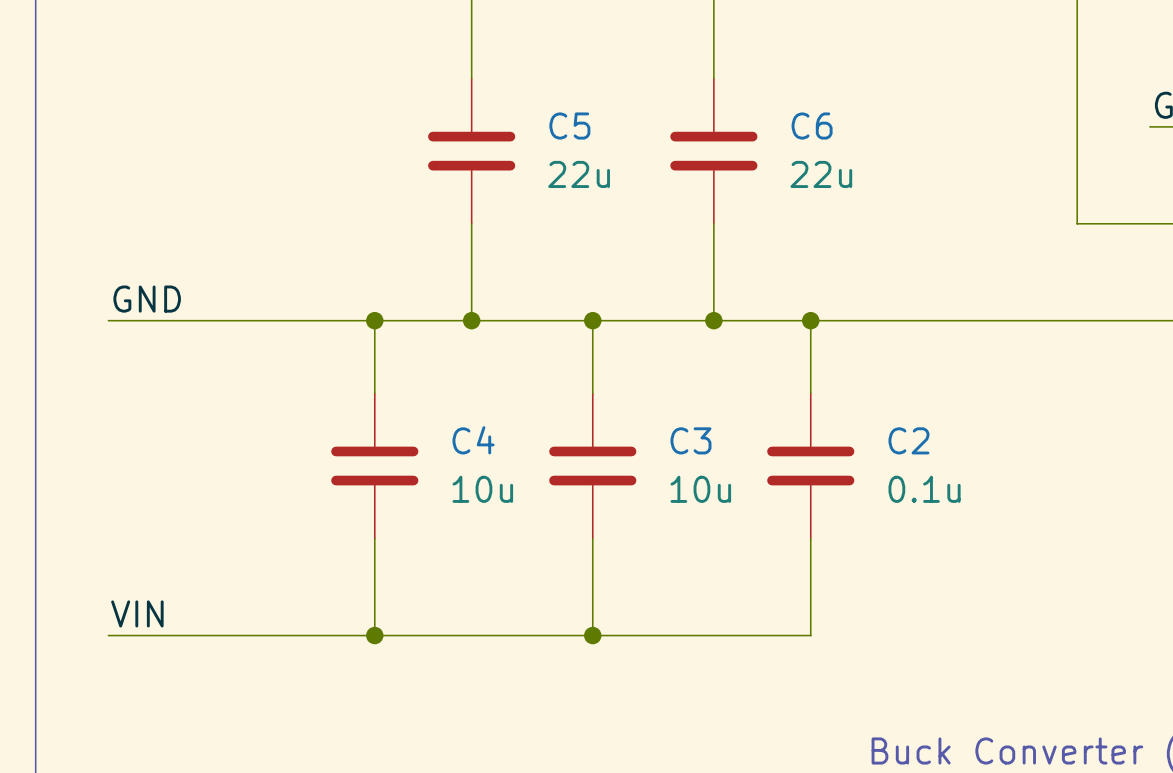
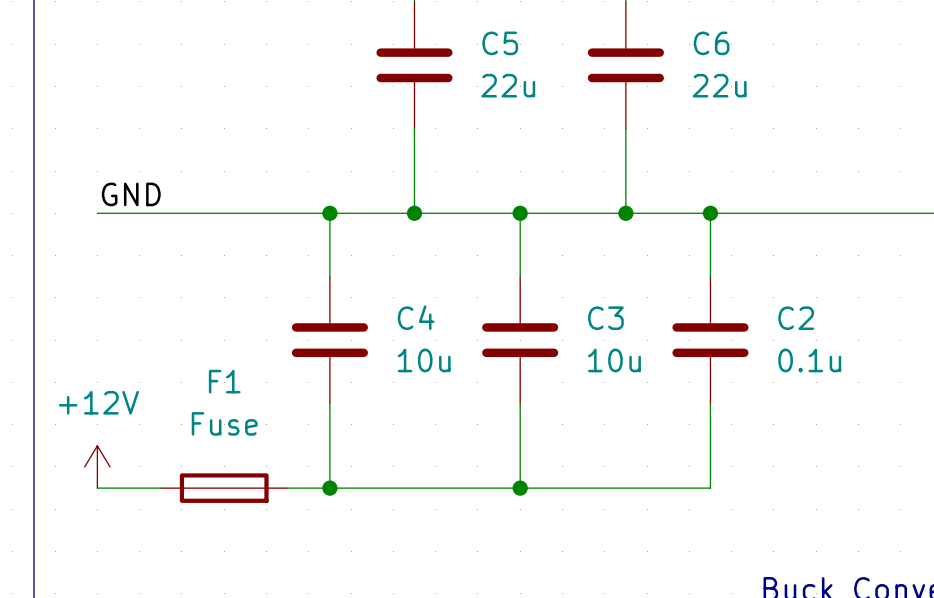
power symbol: none -> +12V (97, 466)
label: VIN (137, 613) -> none
F1: none -> Fuse (224, 488)

